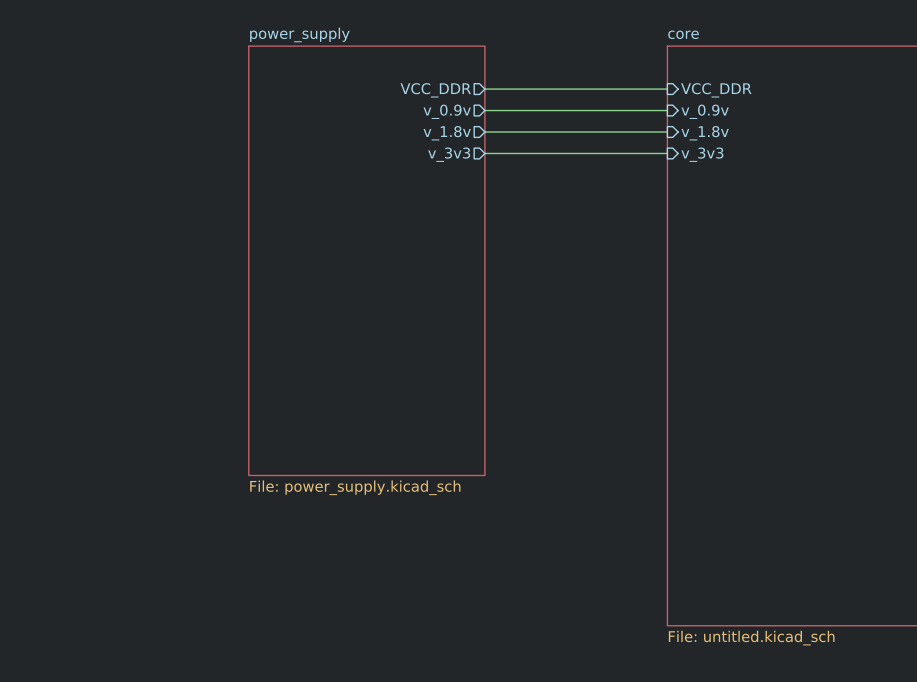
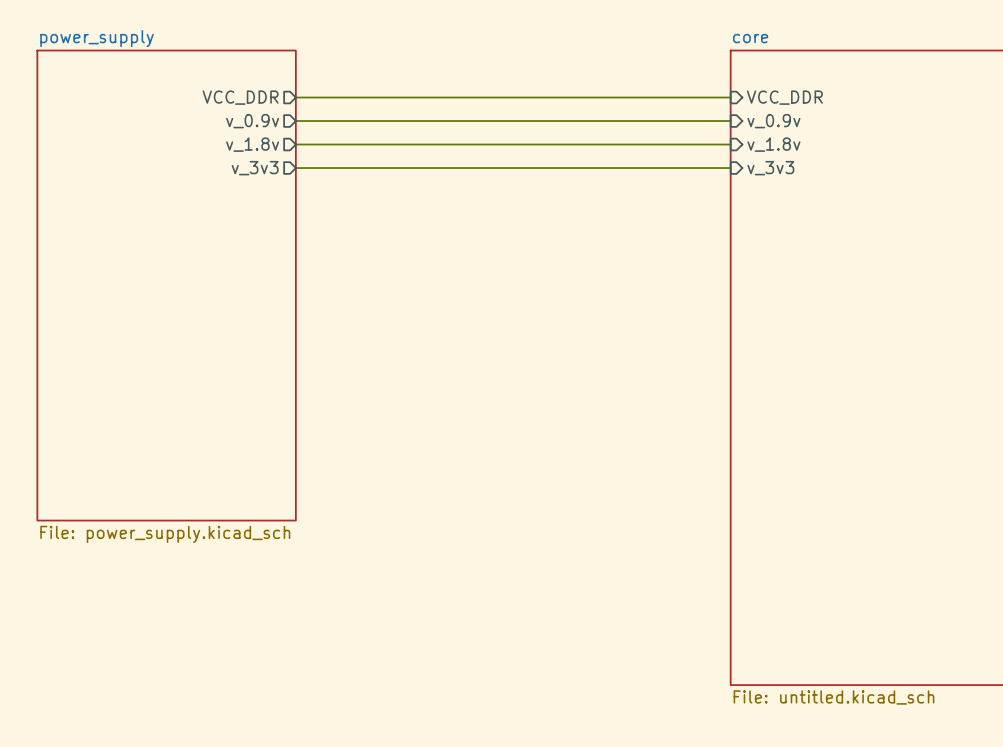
wire: none -> (295, 97) (530, 97)
sheet pin: none -> VCC_DDR (240, 97)
sheet pin: VCC_DDR (435, 90) -> none
wire: none -> (295, 121) (530, 121)
sheet pin: none -> v_0.9v (252, 121)
sheet pin: v_0.9v (447, 111) -> none
wire: none -> (295, 144) (530, 144)
sheet pin: none -> v_1.8v (252, 144)
sheet pin: v_1.8v (447, 133) -> none
wire: none -> (295, 168) (530, 168)
sheet pin: none -> v_3v3 (255, 168)
sheet pin: v_3v3 (449, 154) -> none
sheet power_supply: none -> File: power_supply.kicad_sch (166, 285)
sheet power_supply: File: power_supply.kicad_sch (366, 260) -> none

